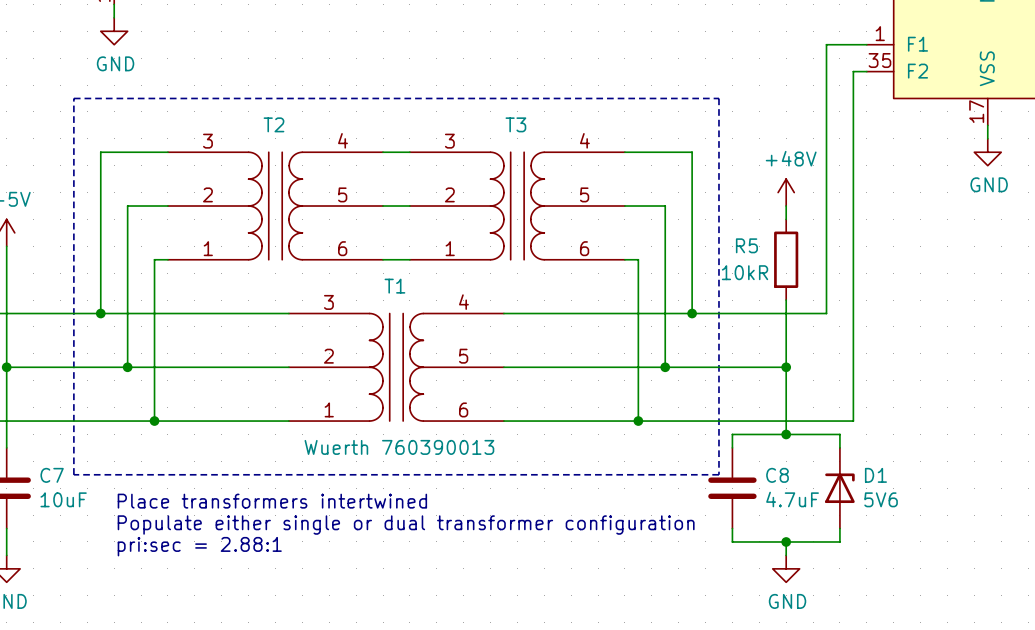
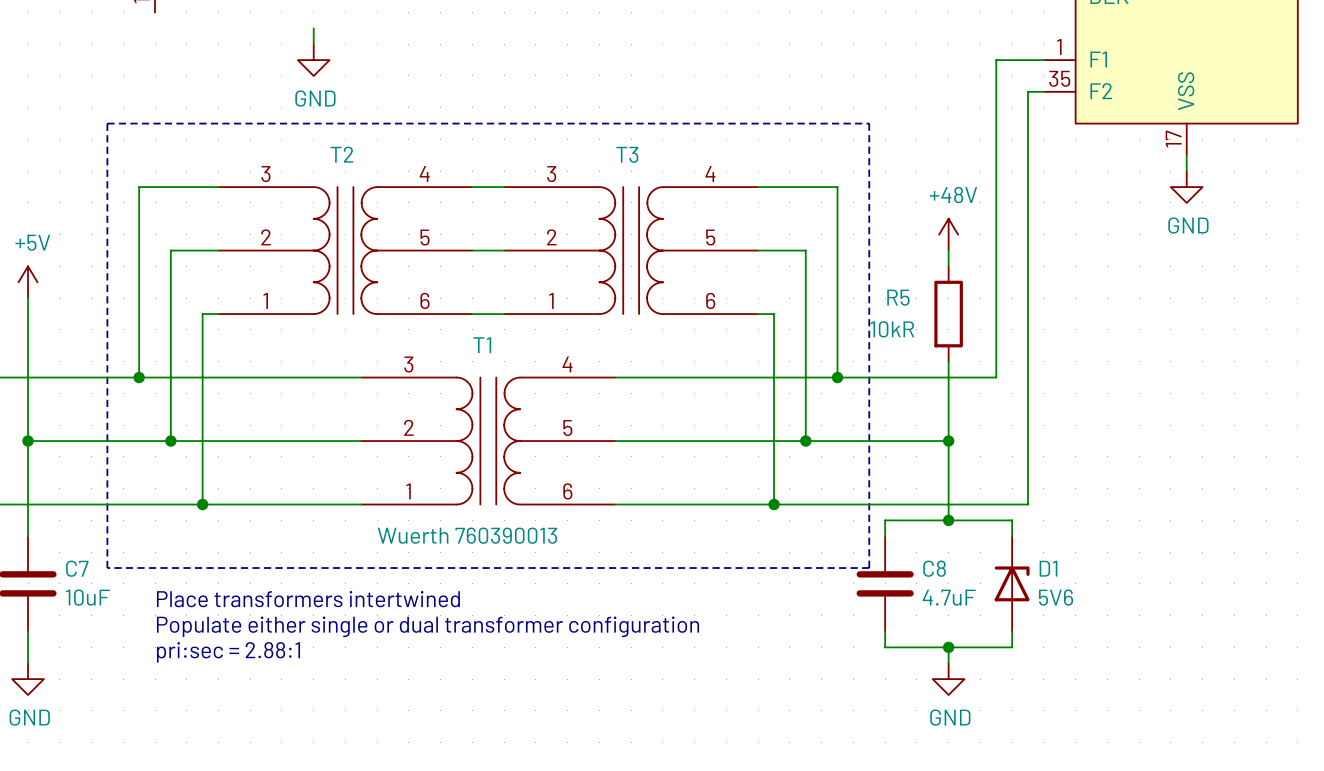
wire: (114, 4) (114, 17) -> (313, 28) (313, 44)
power symbol position: GND (114, 31) -> GND (313, 60)

